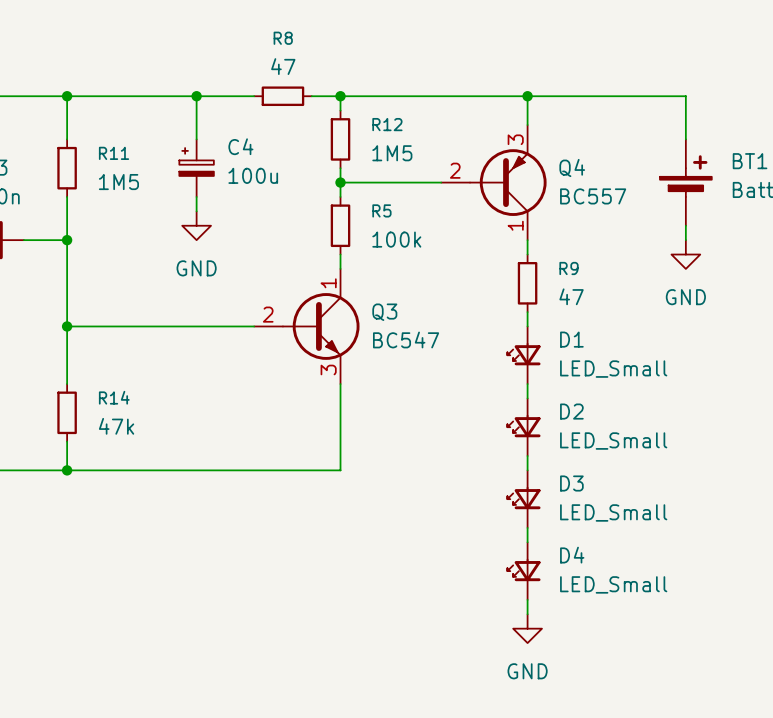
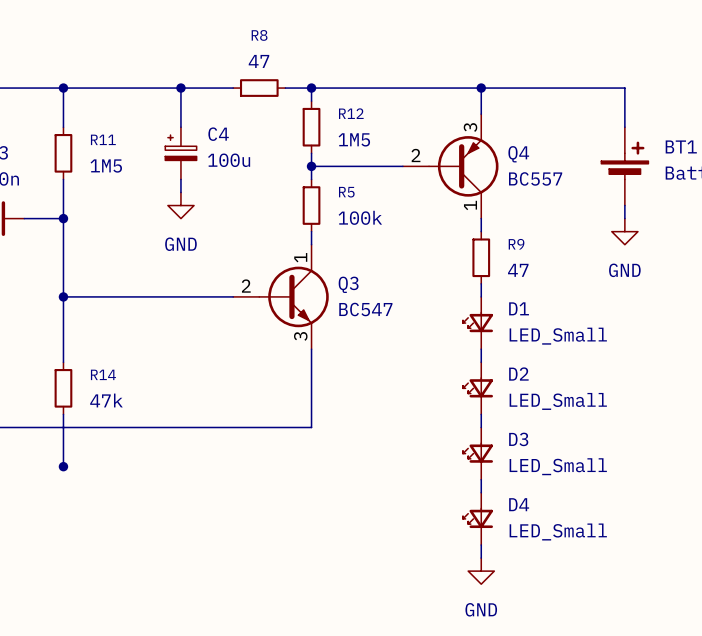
R14 position: (67, 412) -> (63, 388)
wire: none -> (63, 427) (63, 466)
junction position: (67, 470) -> (63, 466)

